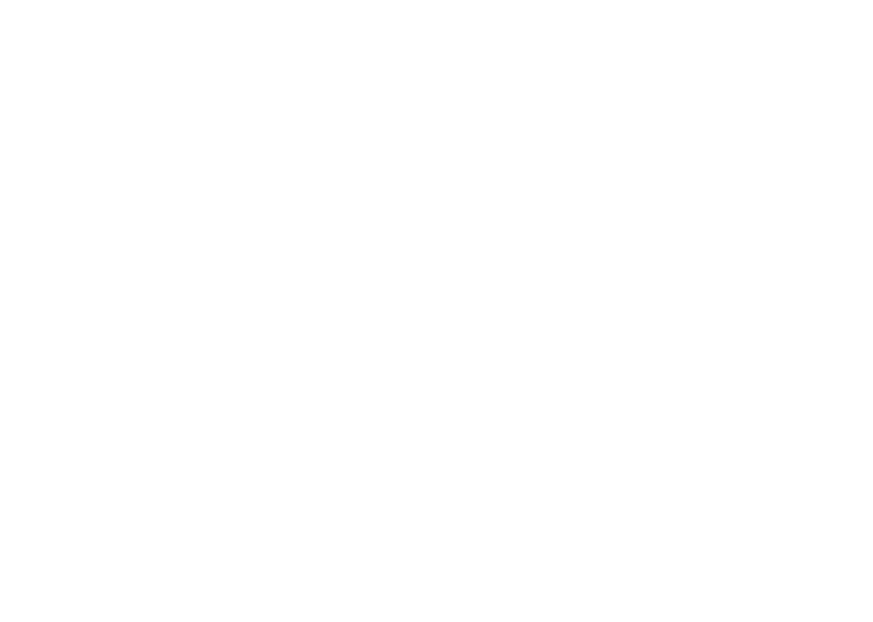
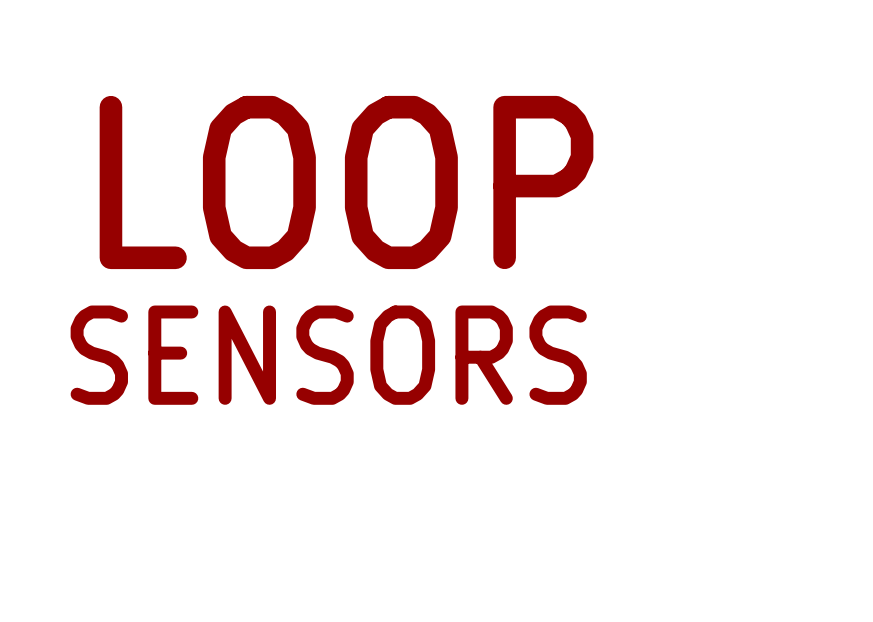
text: none -> LOOP (346, 182)
text: none -> SENSORS (328, 355)

